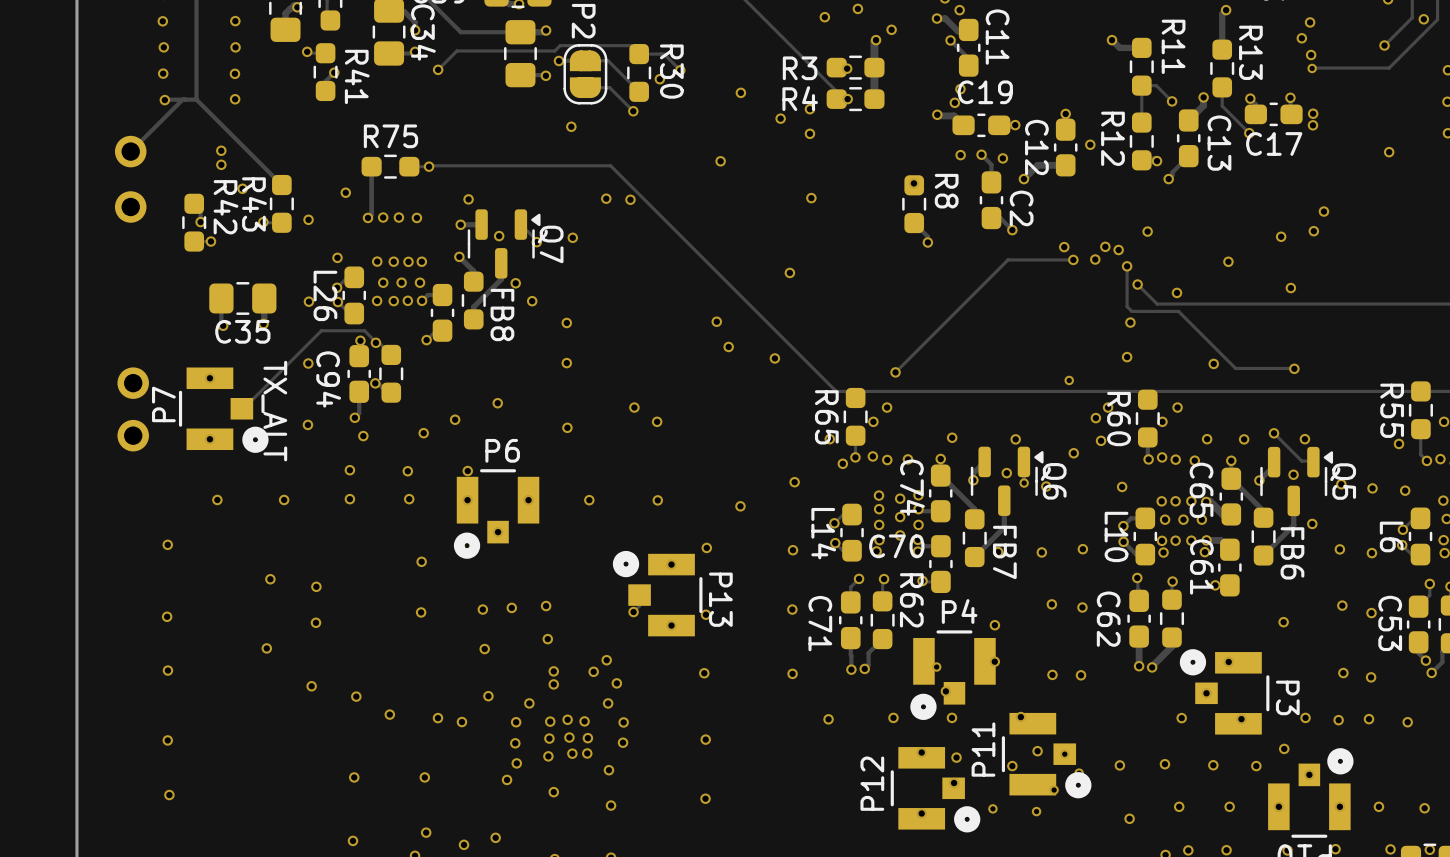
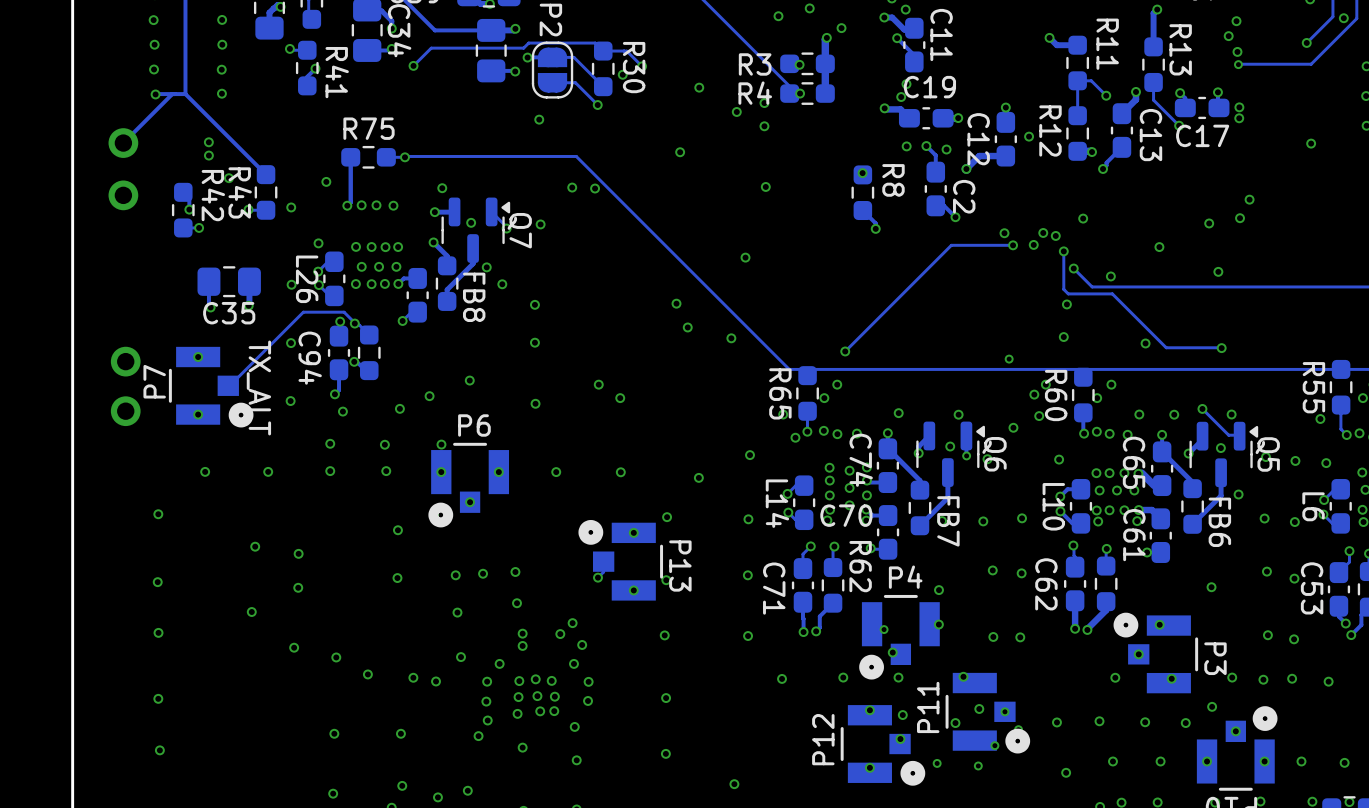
via: none -> (734, 784)

